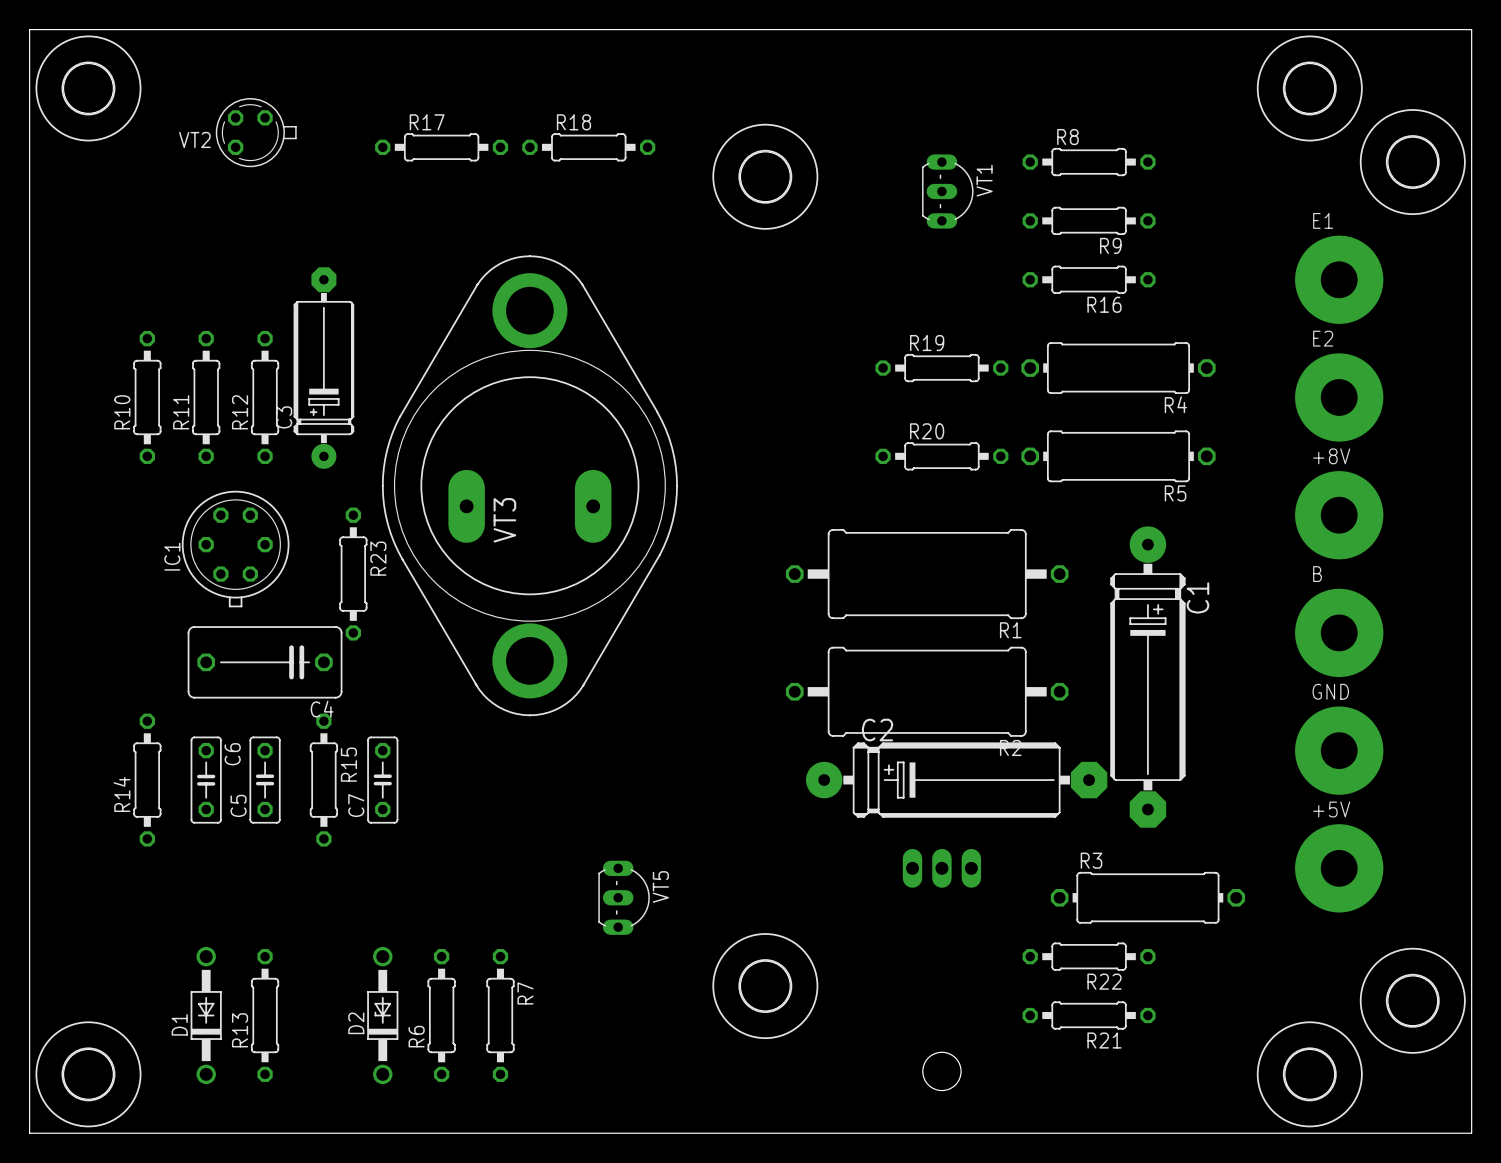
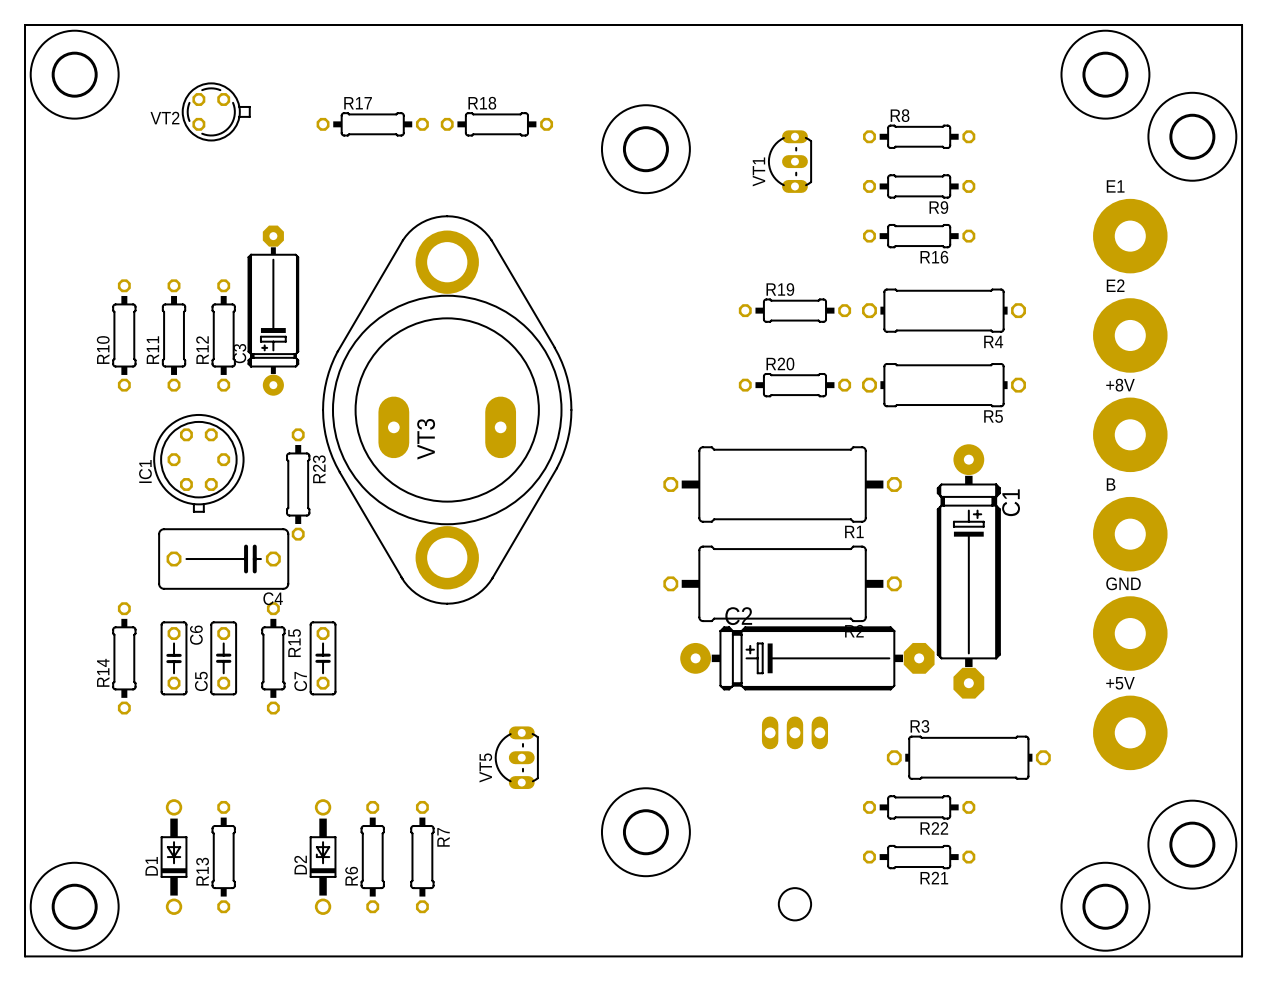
VT1 rotation: 0° (947, 191) -> 180° (790, 161)
VT5 rotation: 0° (624, 897) -> 180° (516, 757)

